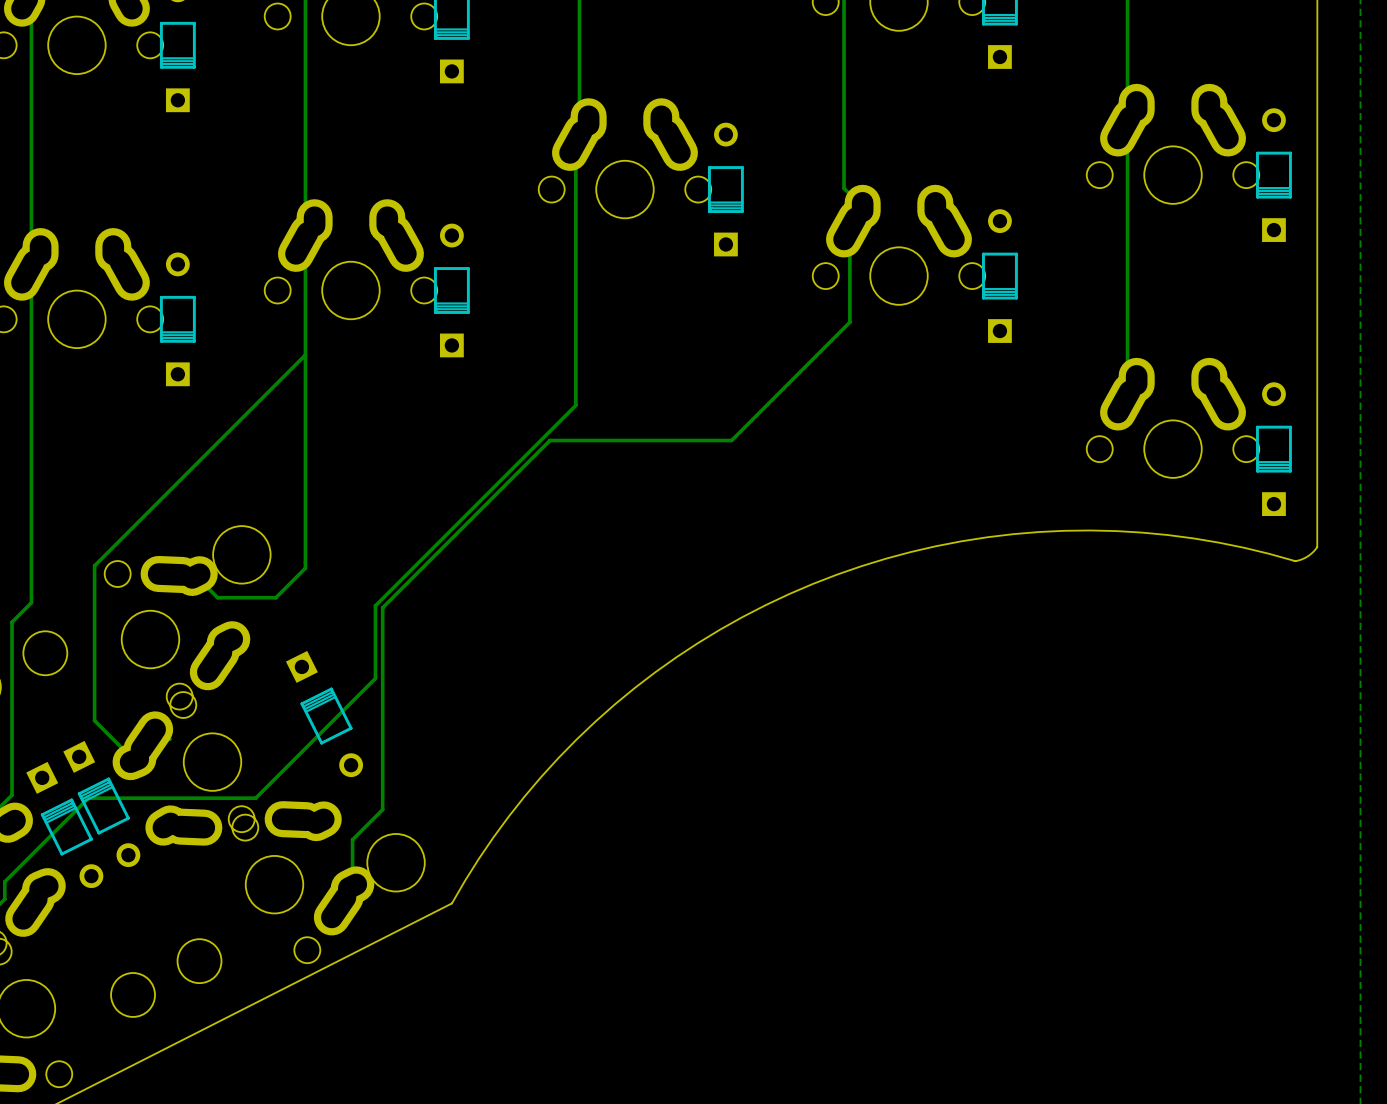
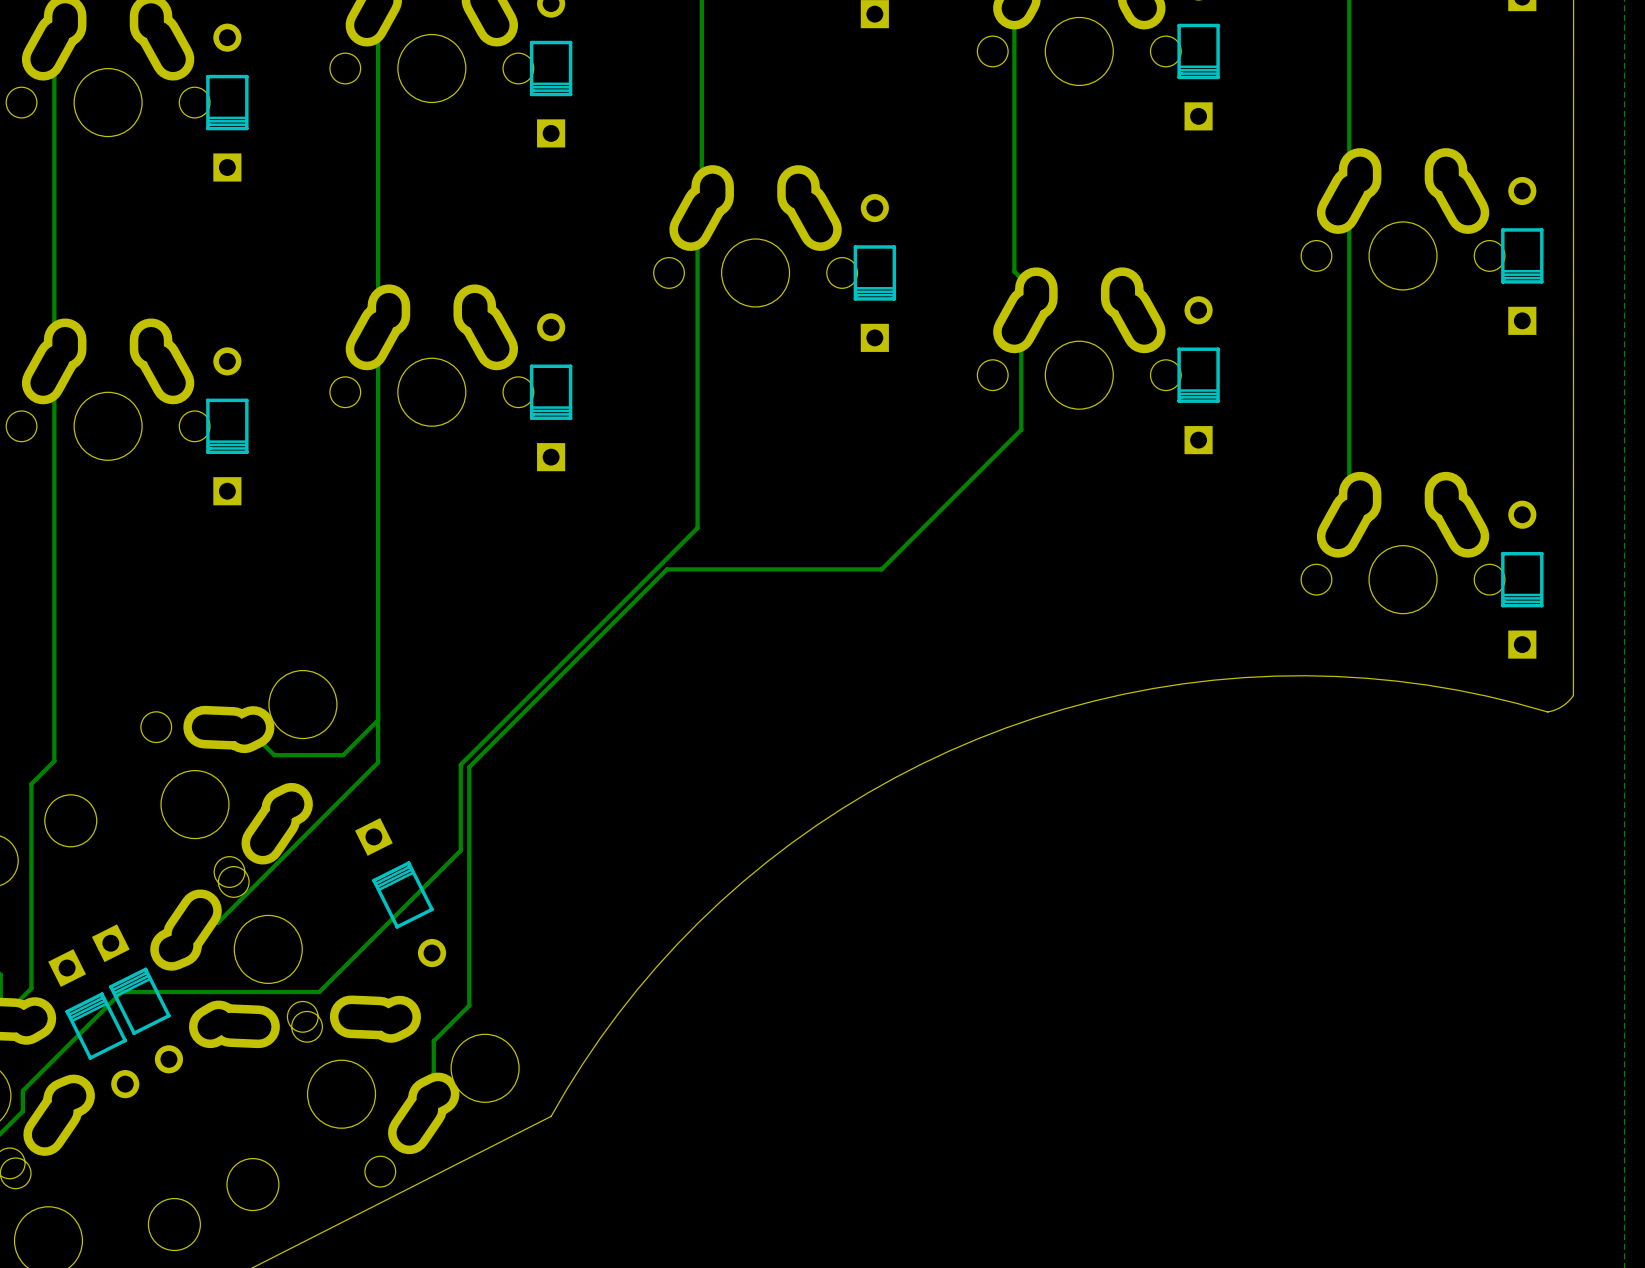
track: (305, 355) (94, 565) (94, 720) (134, 760) -> none
track: none -> (378, 720) (378, 762) (218, 922)

